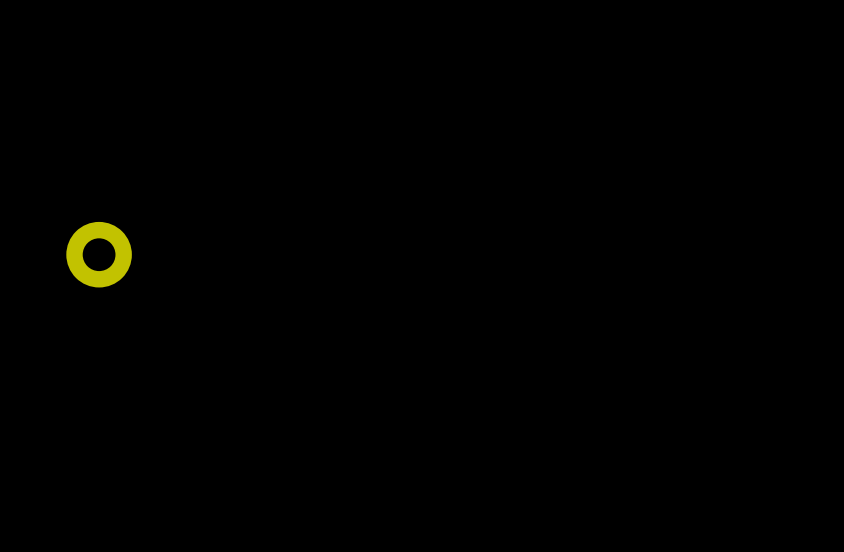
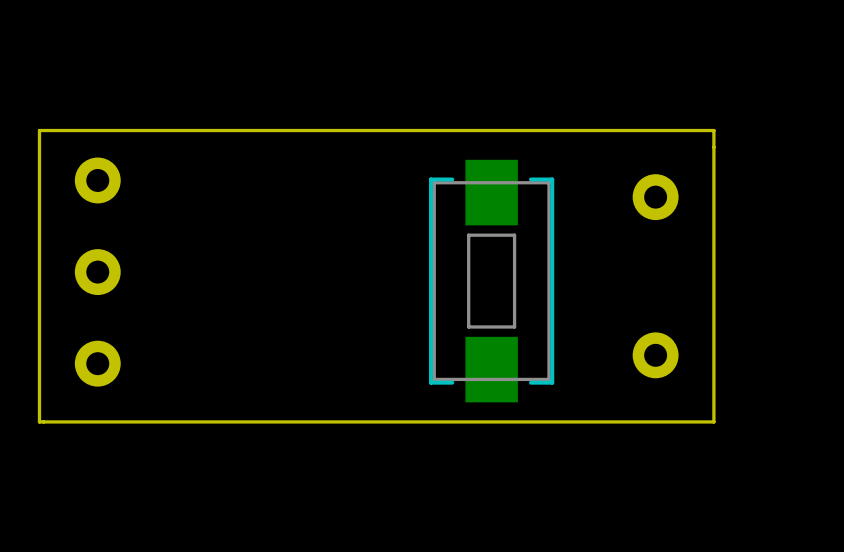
board edge: none -> (713, 130) (713, 421) (39, 421) (39, 130) (713, 130)
part: none -> (97, 180)
part: none -> (655, 197)
part footprint: [66, 221, 132, 288] -> [74, 249, 121, 296]
part: none -> (491, 281)
part: none -> (655, 355)
part: none -> (97, 363)

